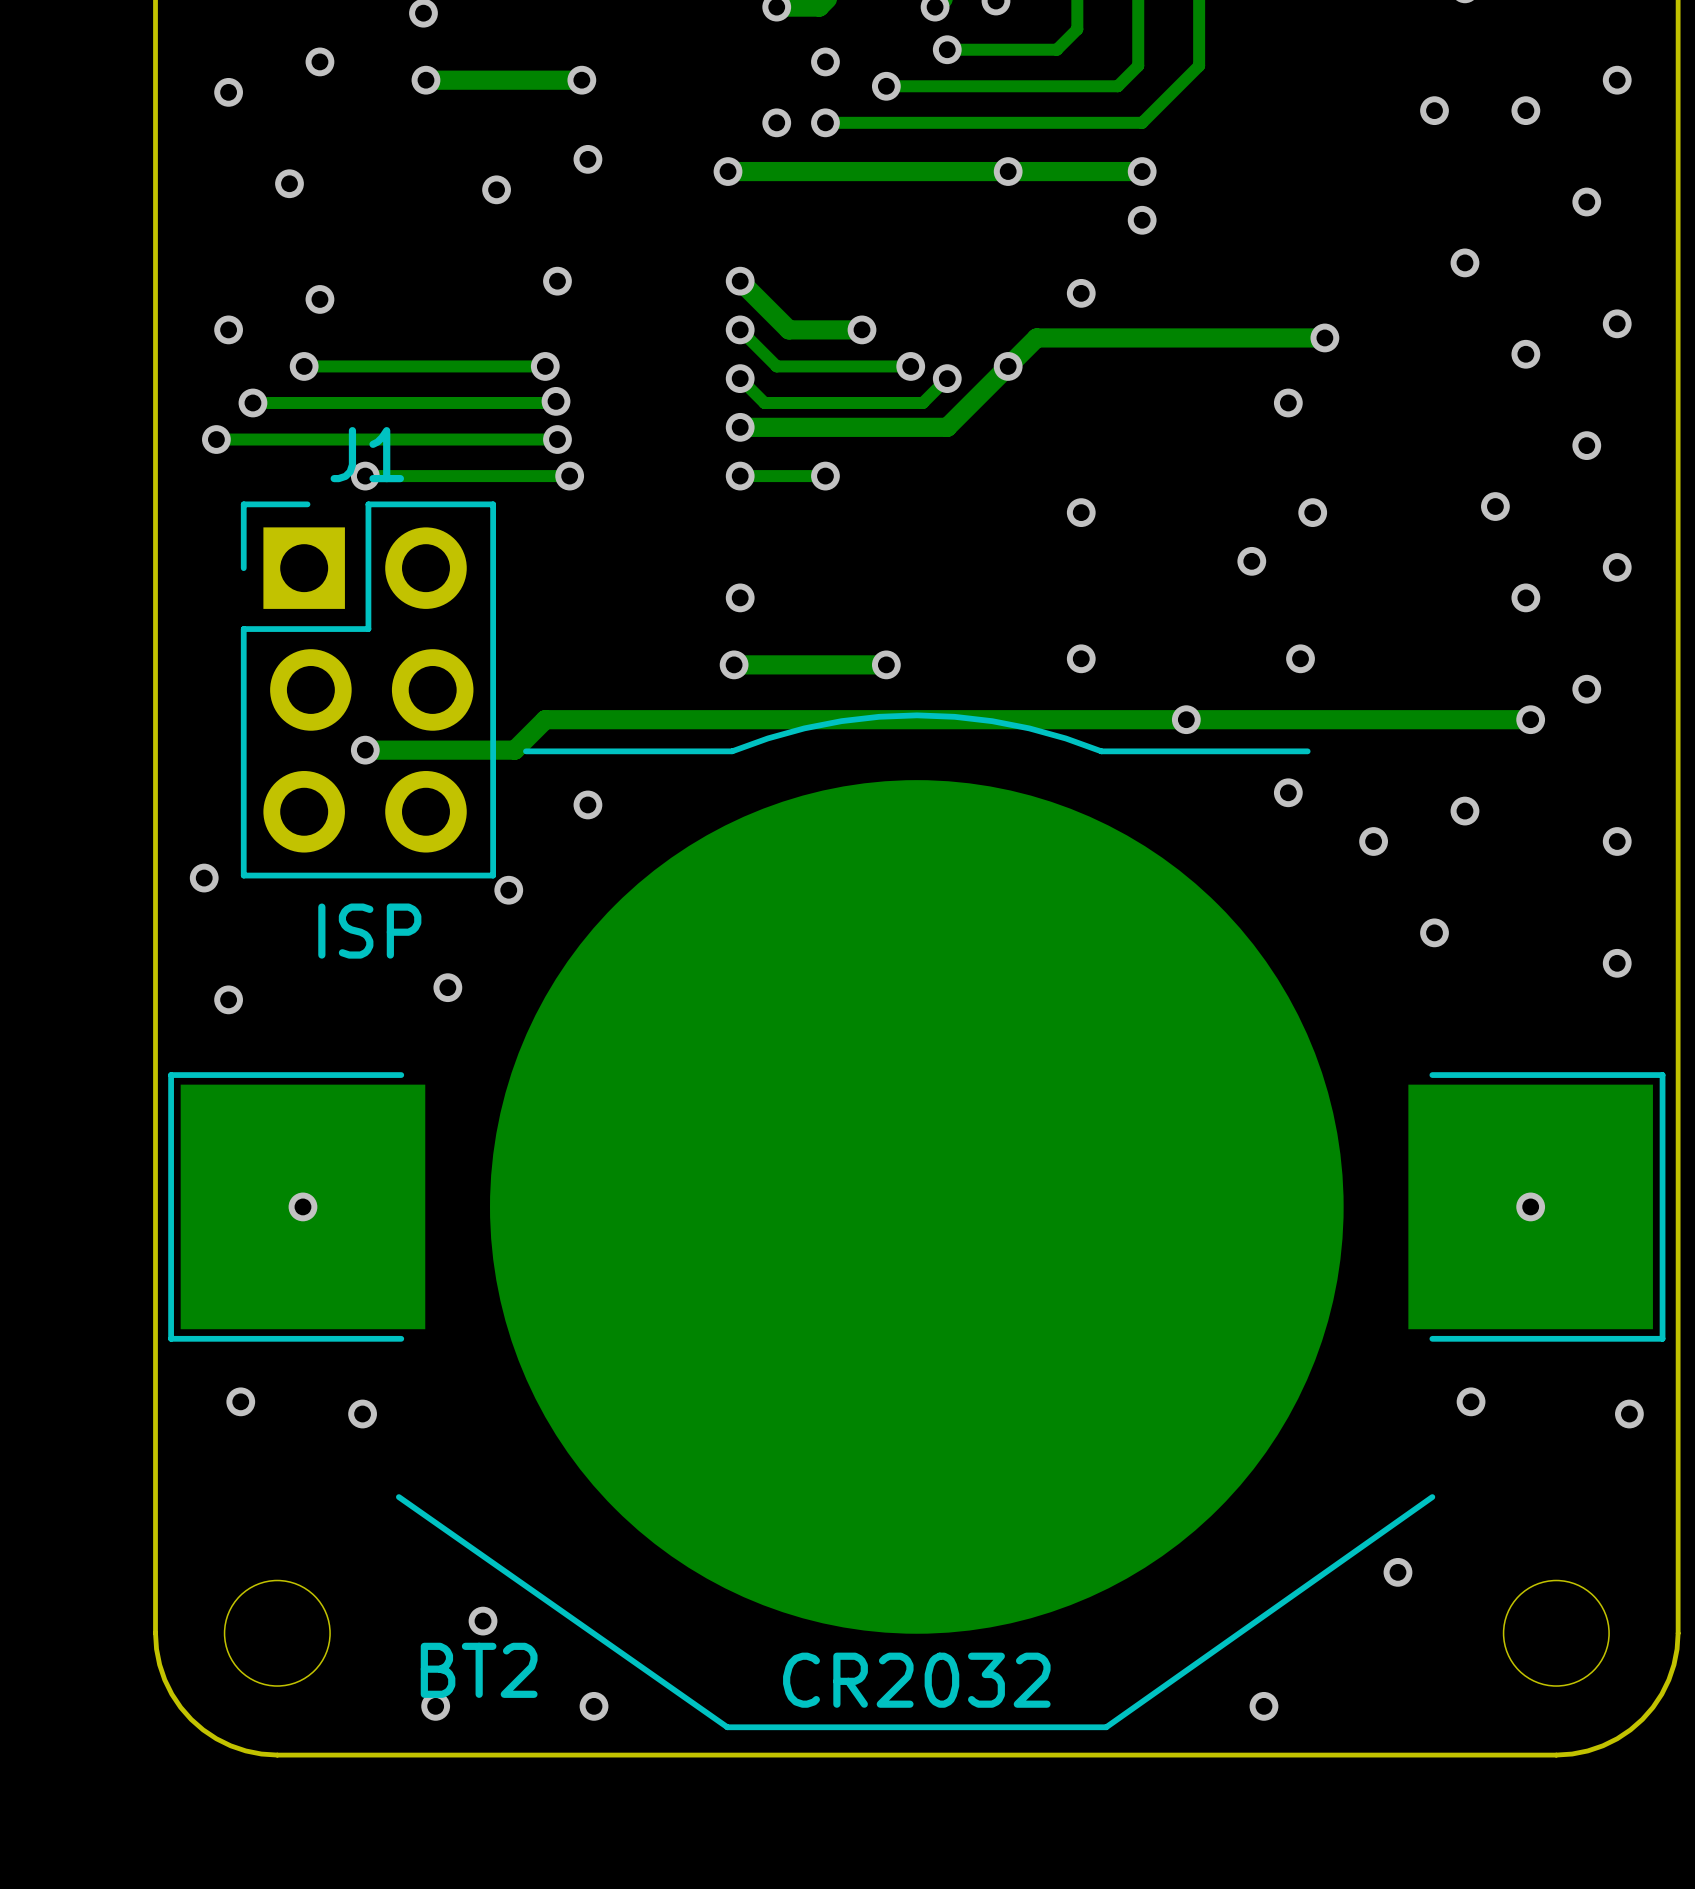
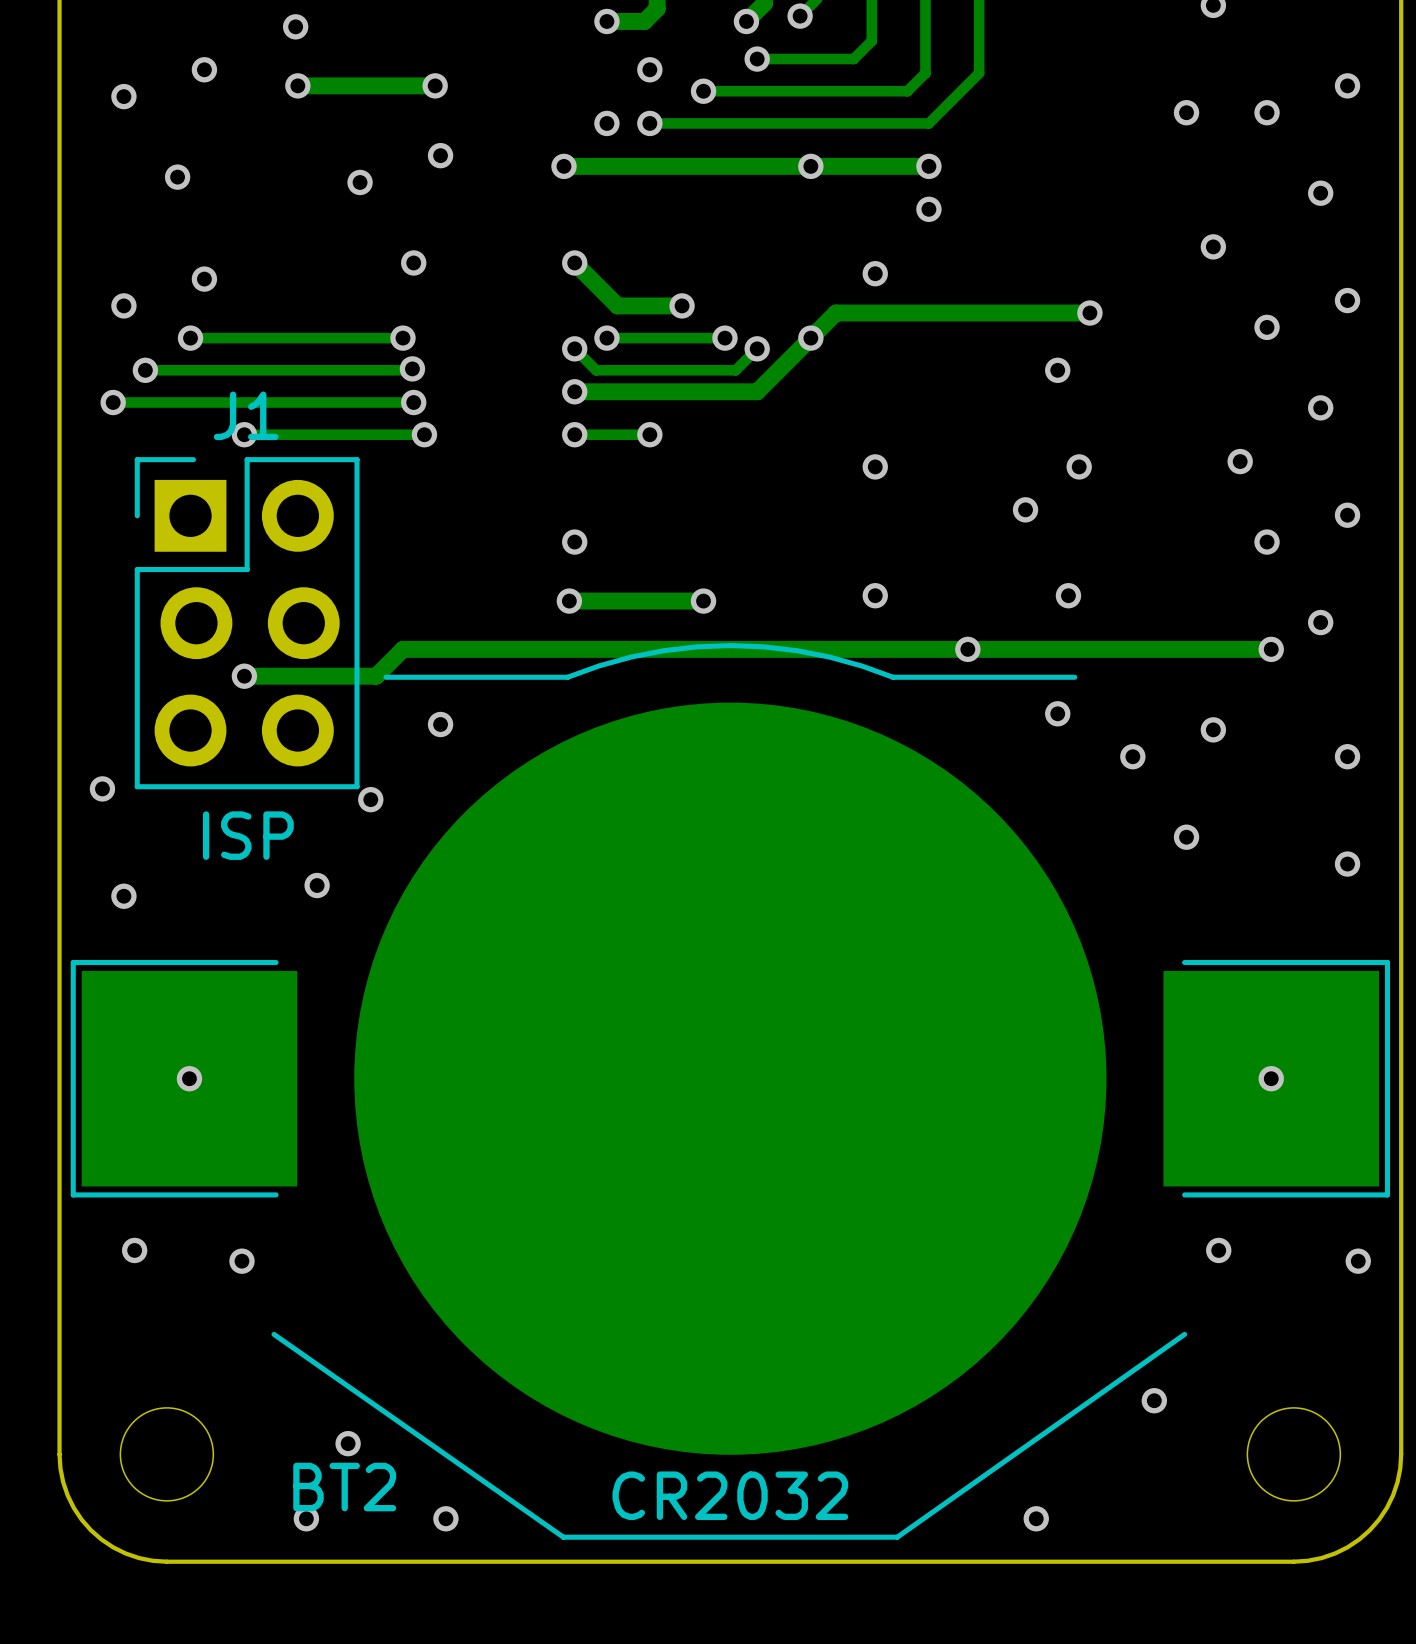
track: (740, 329) (776, 366) -> none
via position: (740, 329) -> (606, 338)

